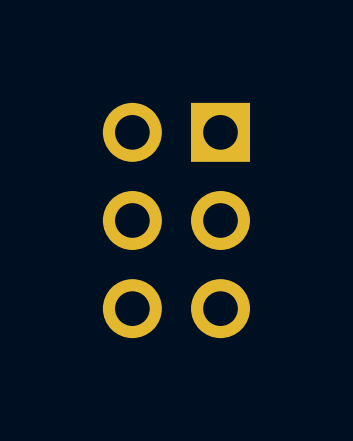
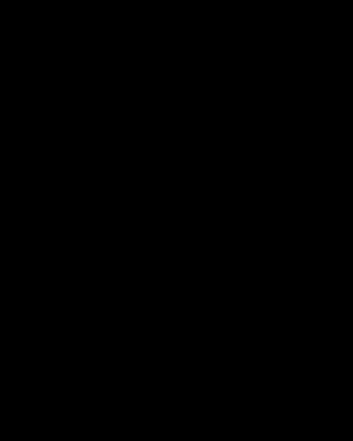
part: (176, 220) -> none

